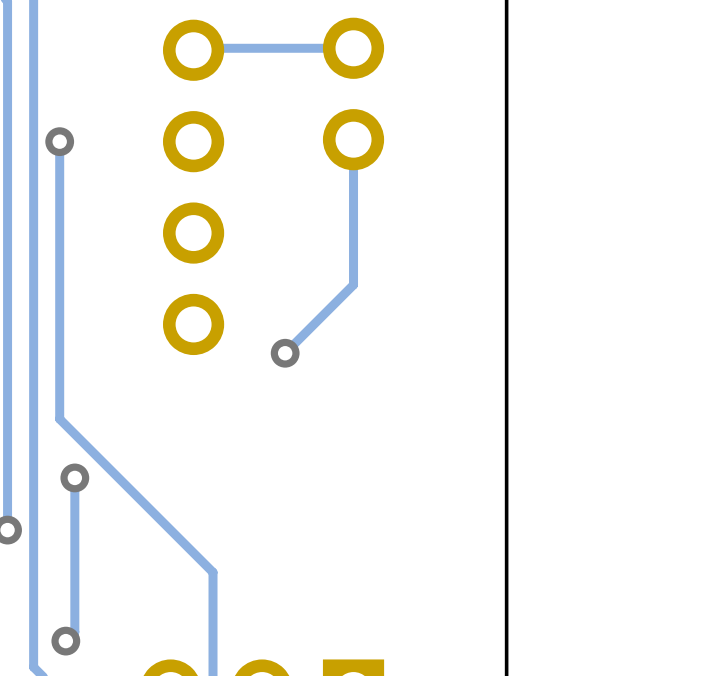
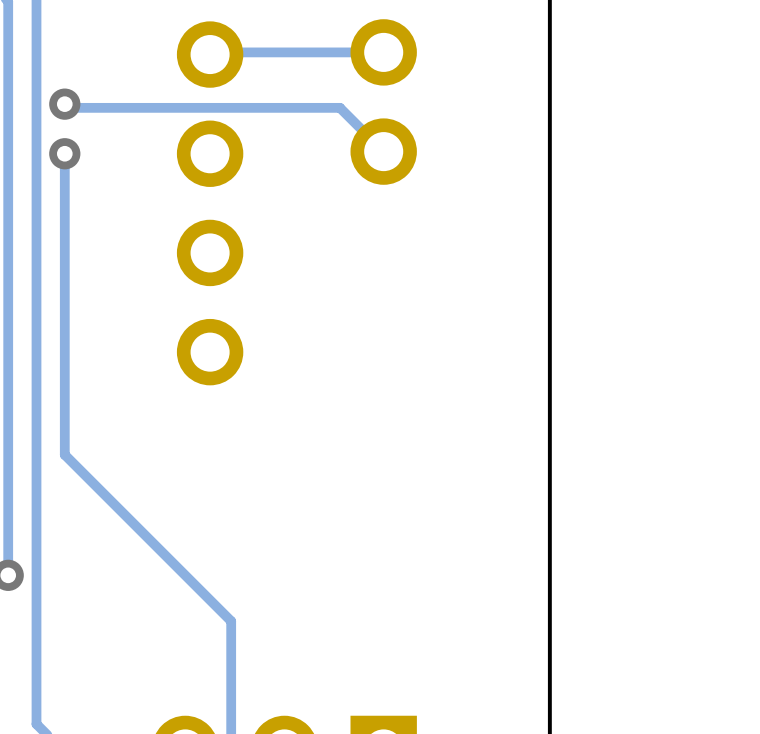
via: none -> (64, 104)
track: (353, 139) (353, 284) (285, 353) -> (383, 151) (339, 107) (68, 107) (64, 104)
via: (285, 353) -> none
track: (74, 477) (74, 632) (65, 641) -> none
via: (74, 477) -> none
via: (65, 641) -> none

